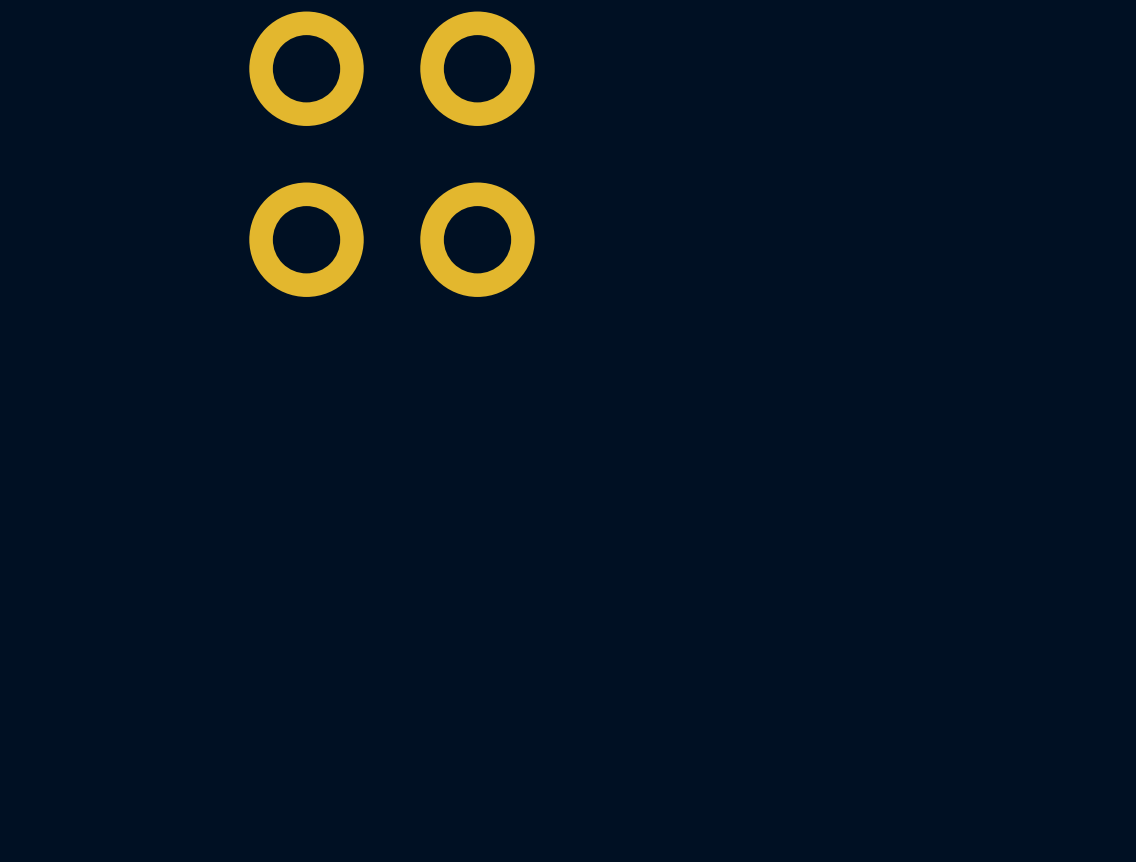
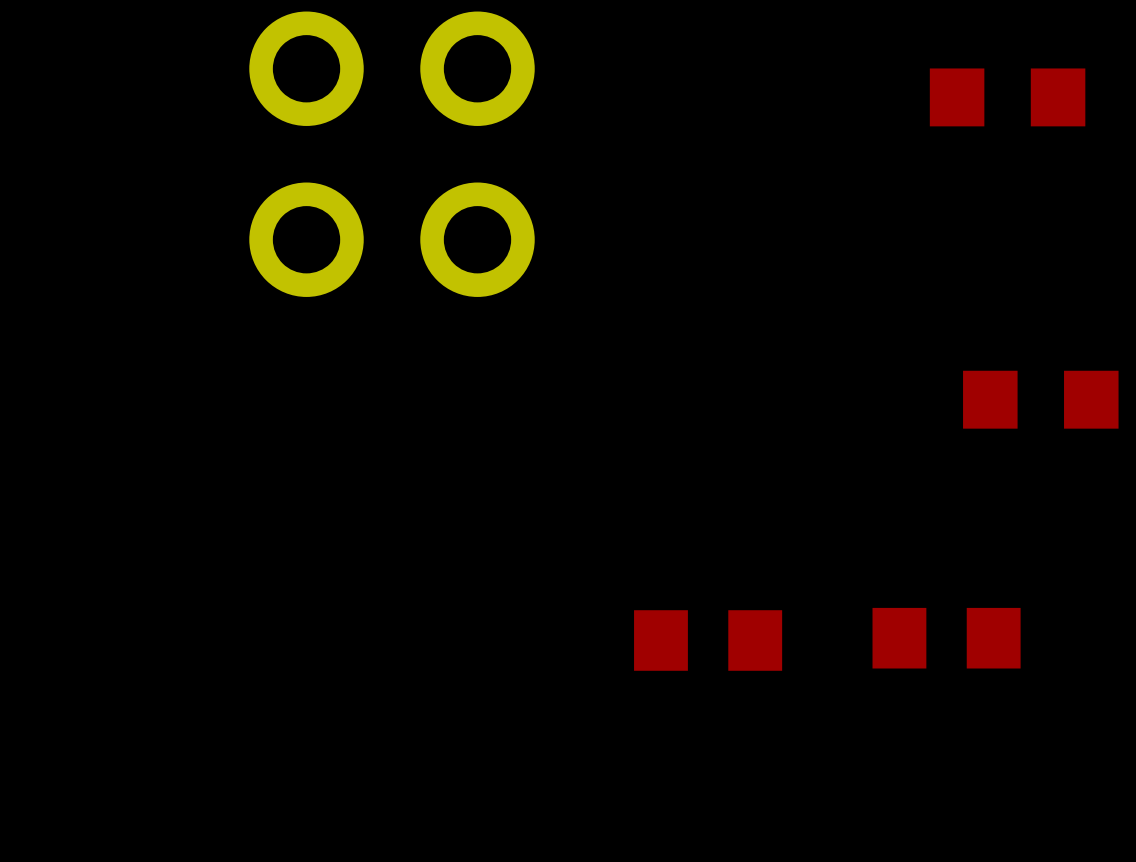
part: none -> (1007, 97)
part: none -> (1040, 399)
part: none -> (946, 638)
part: none -> (708, 640)

